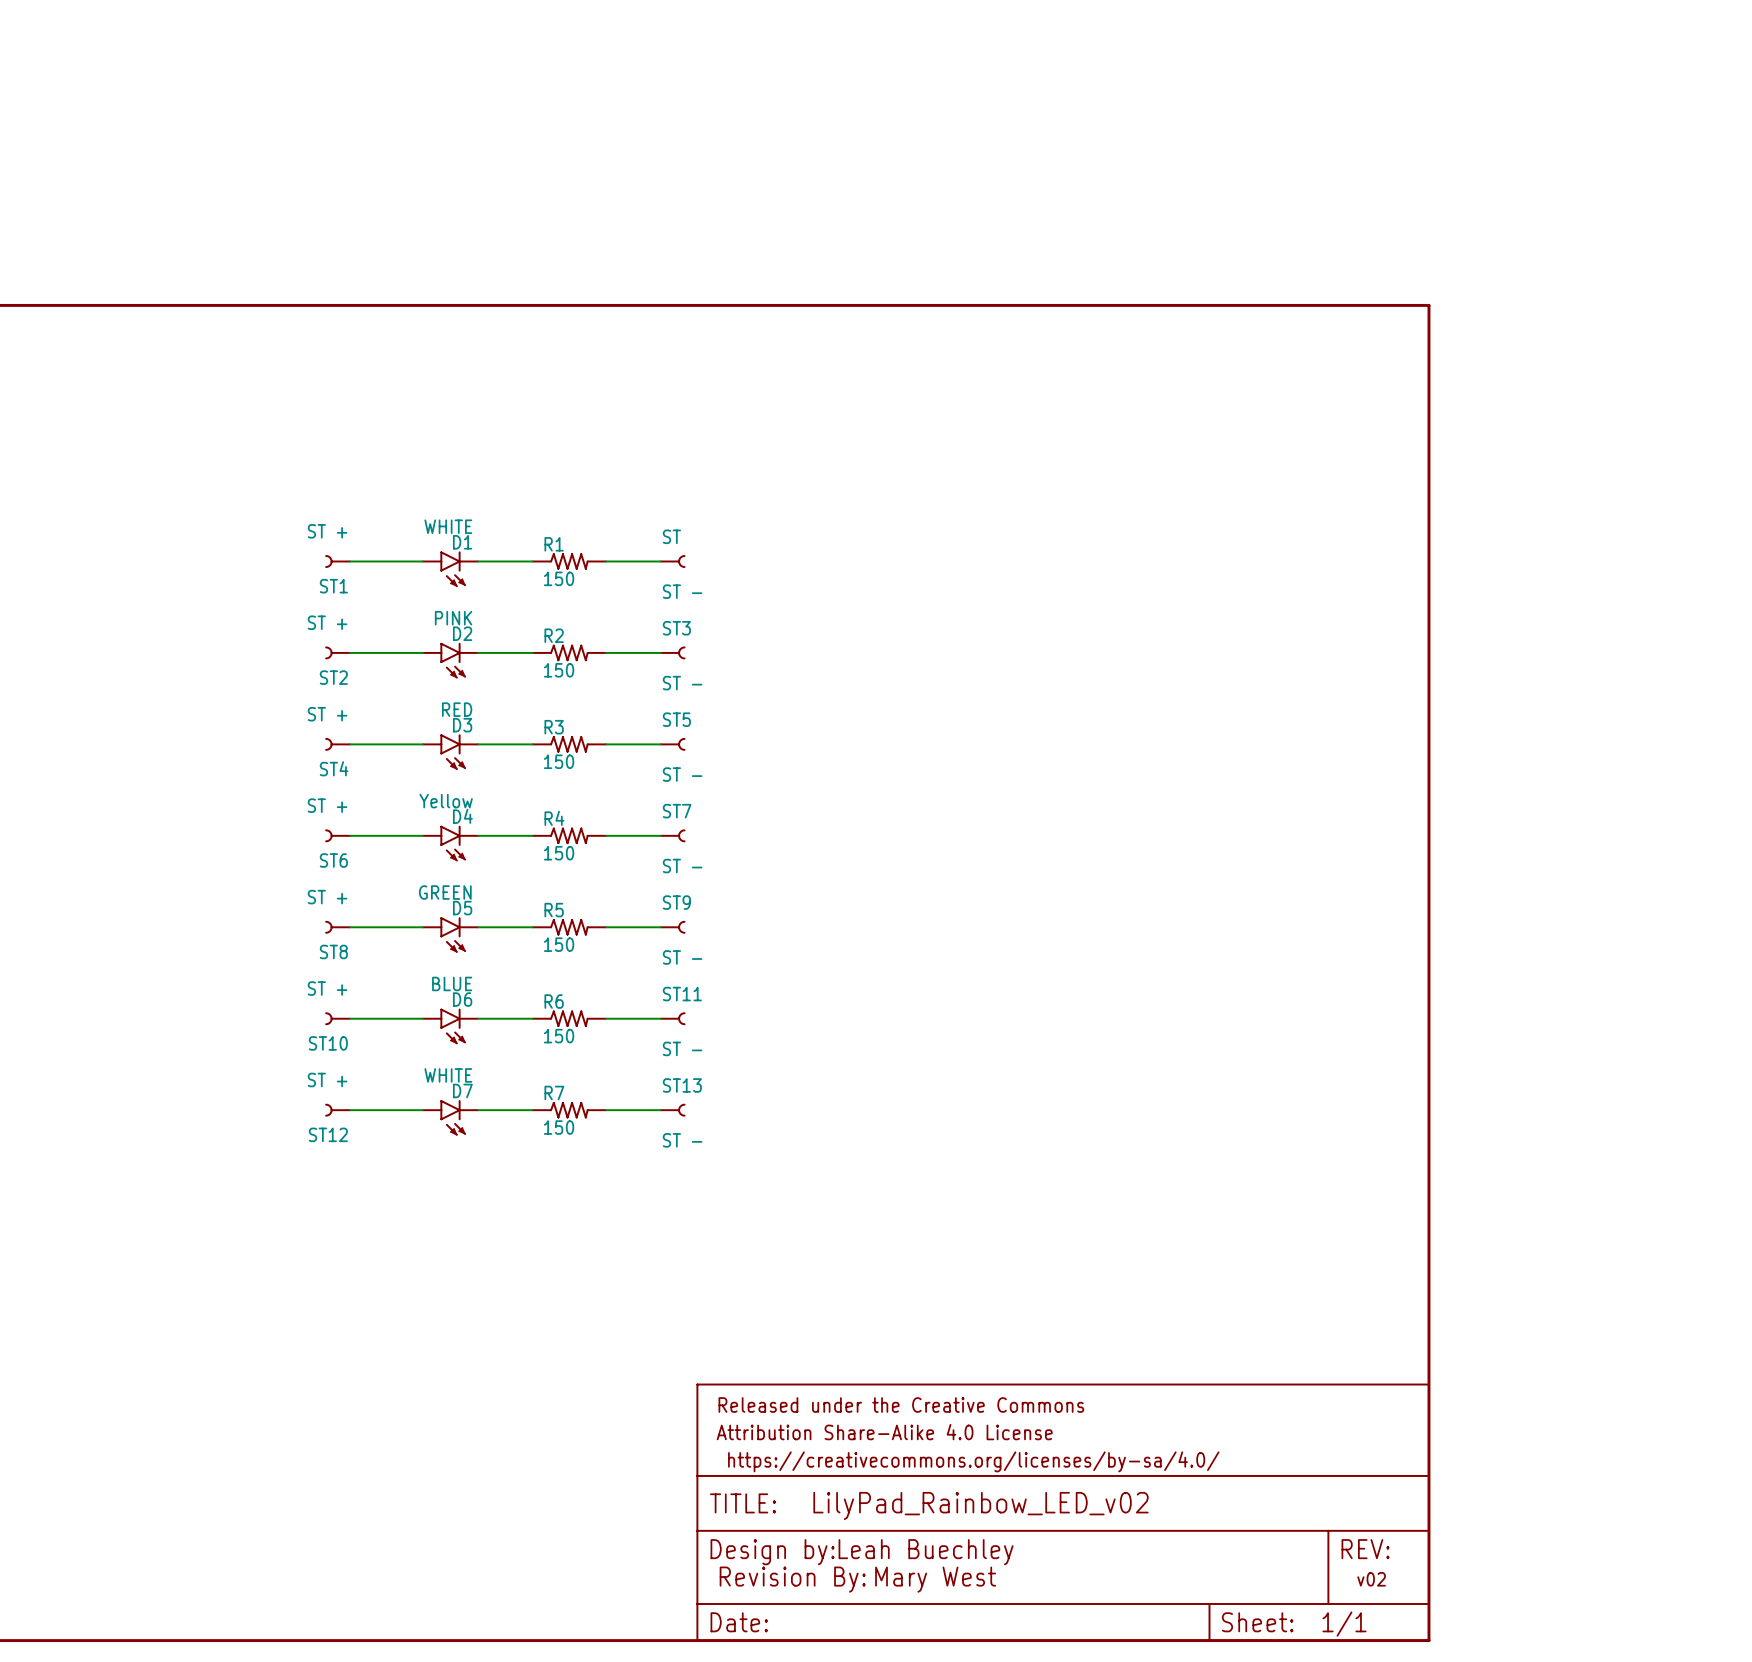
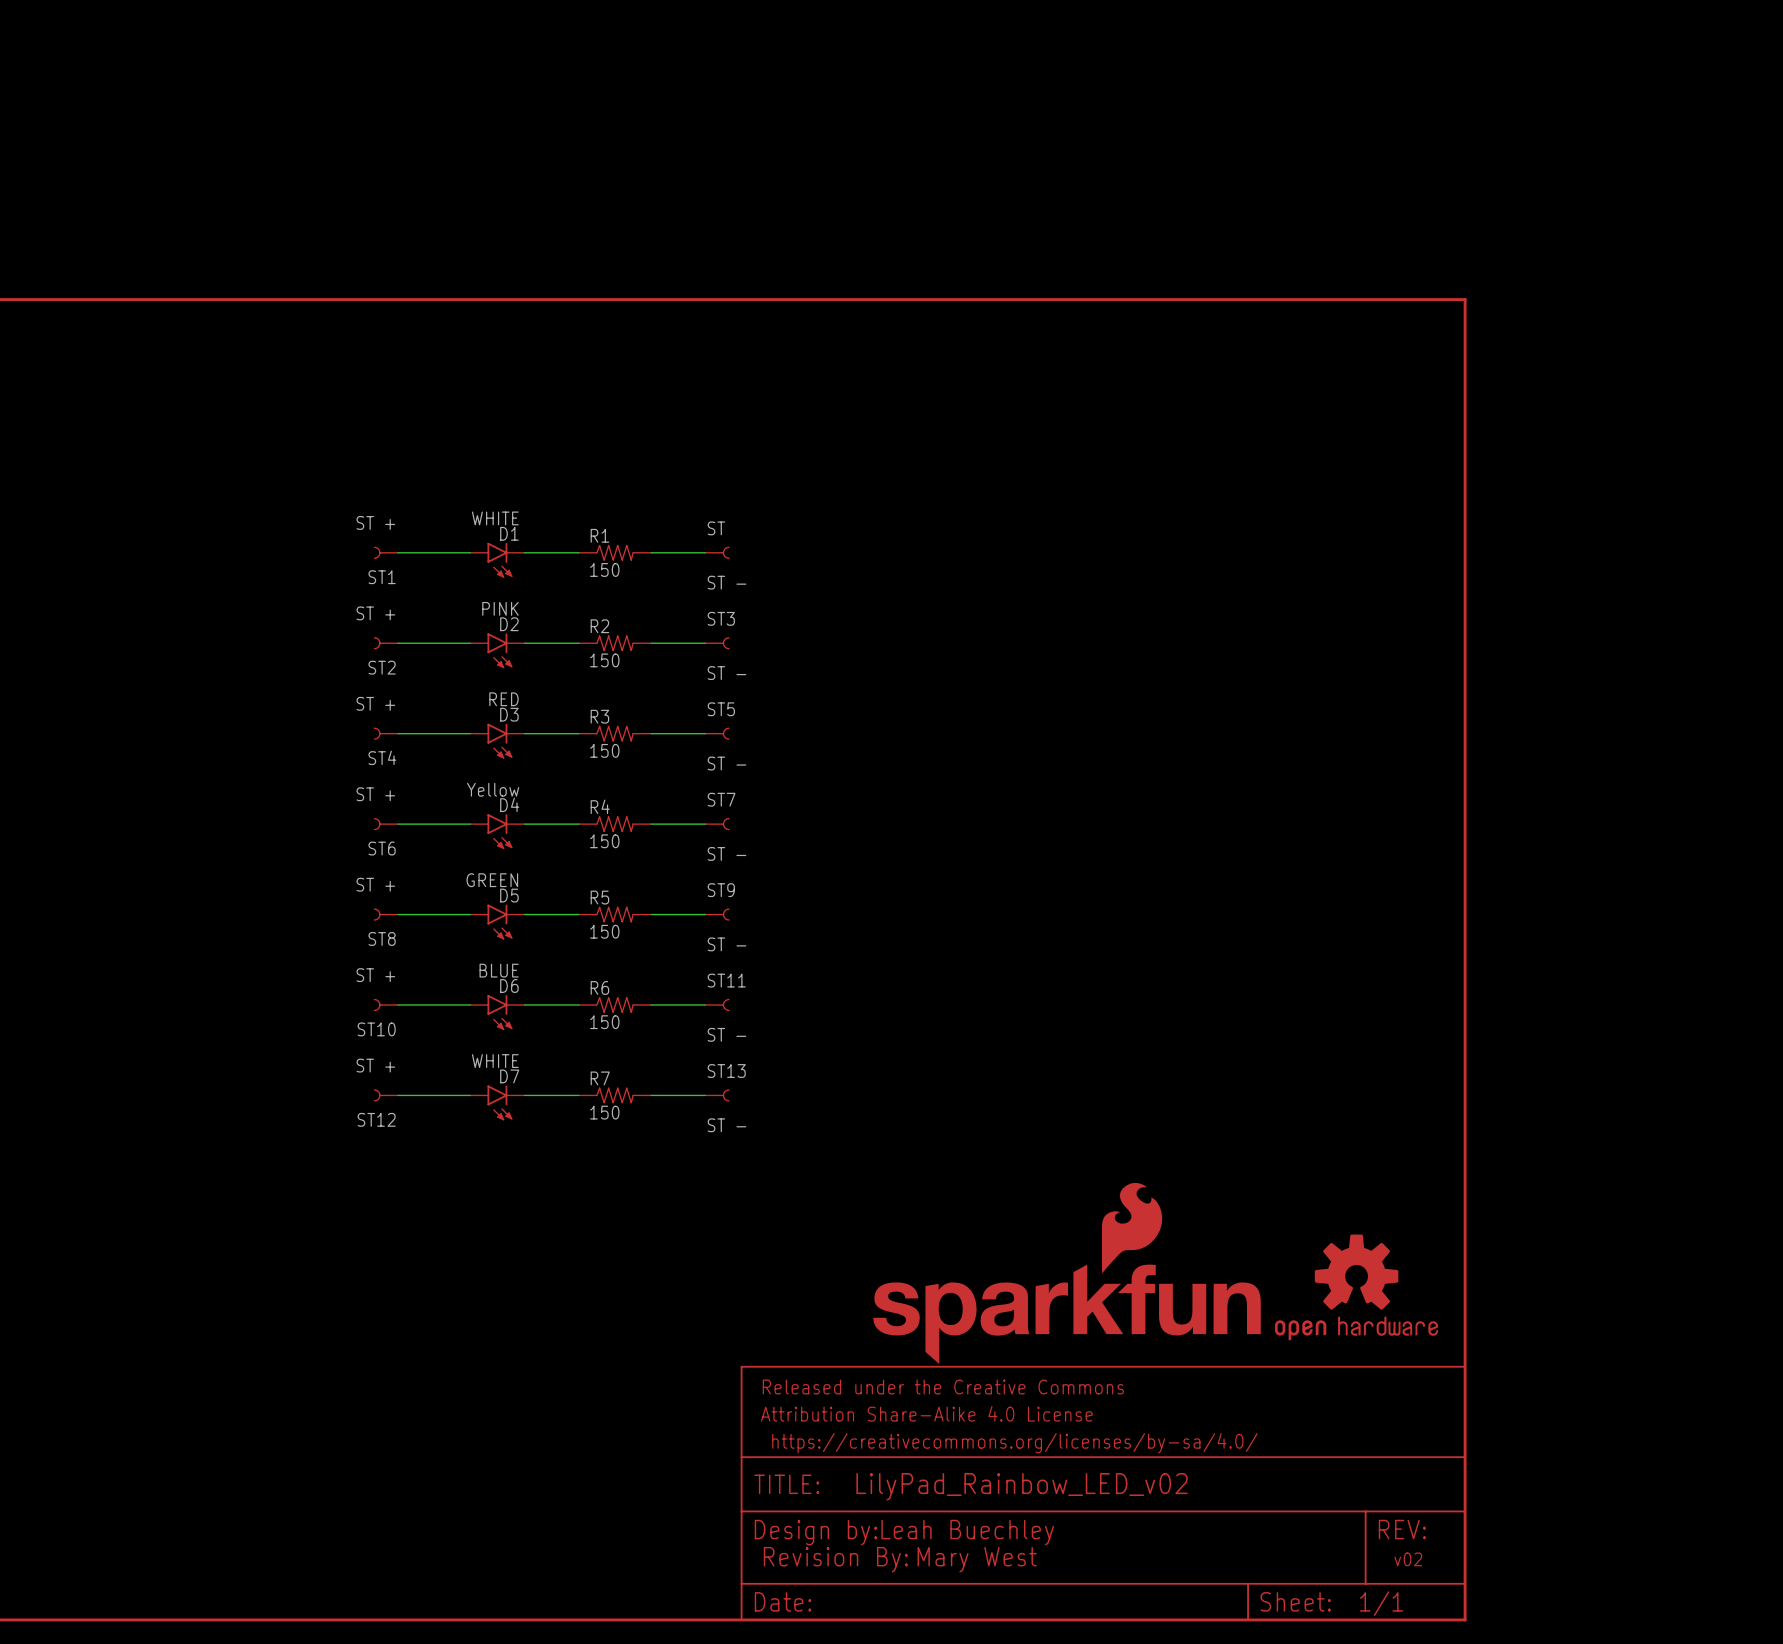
part: none -> (1066, 1273)
part: none -> (1356, 1287)

